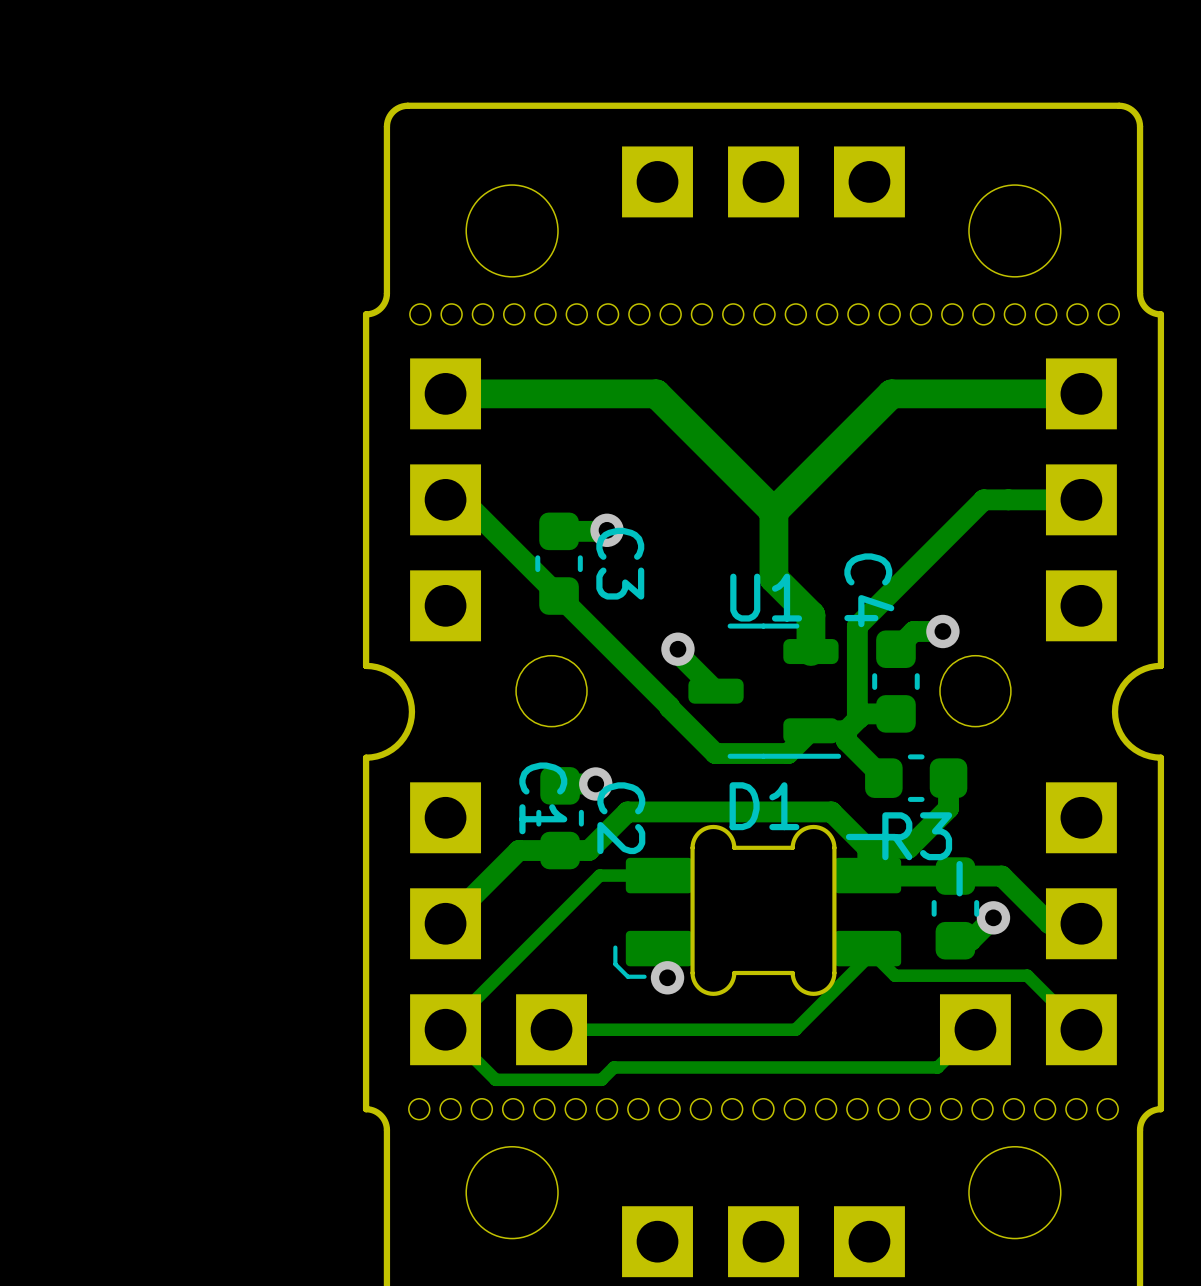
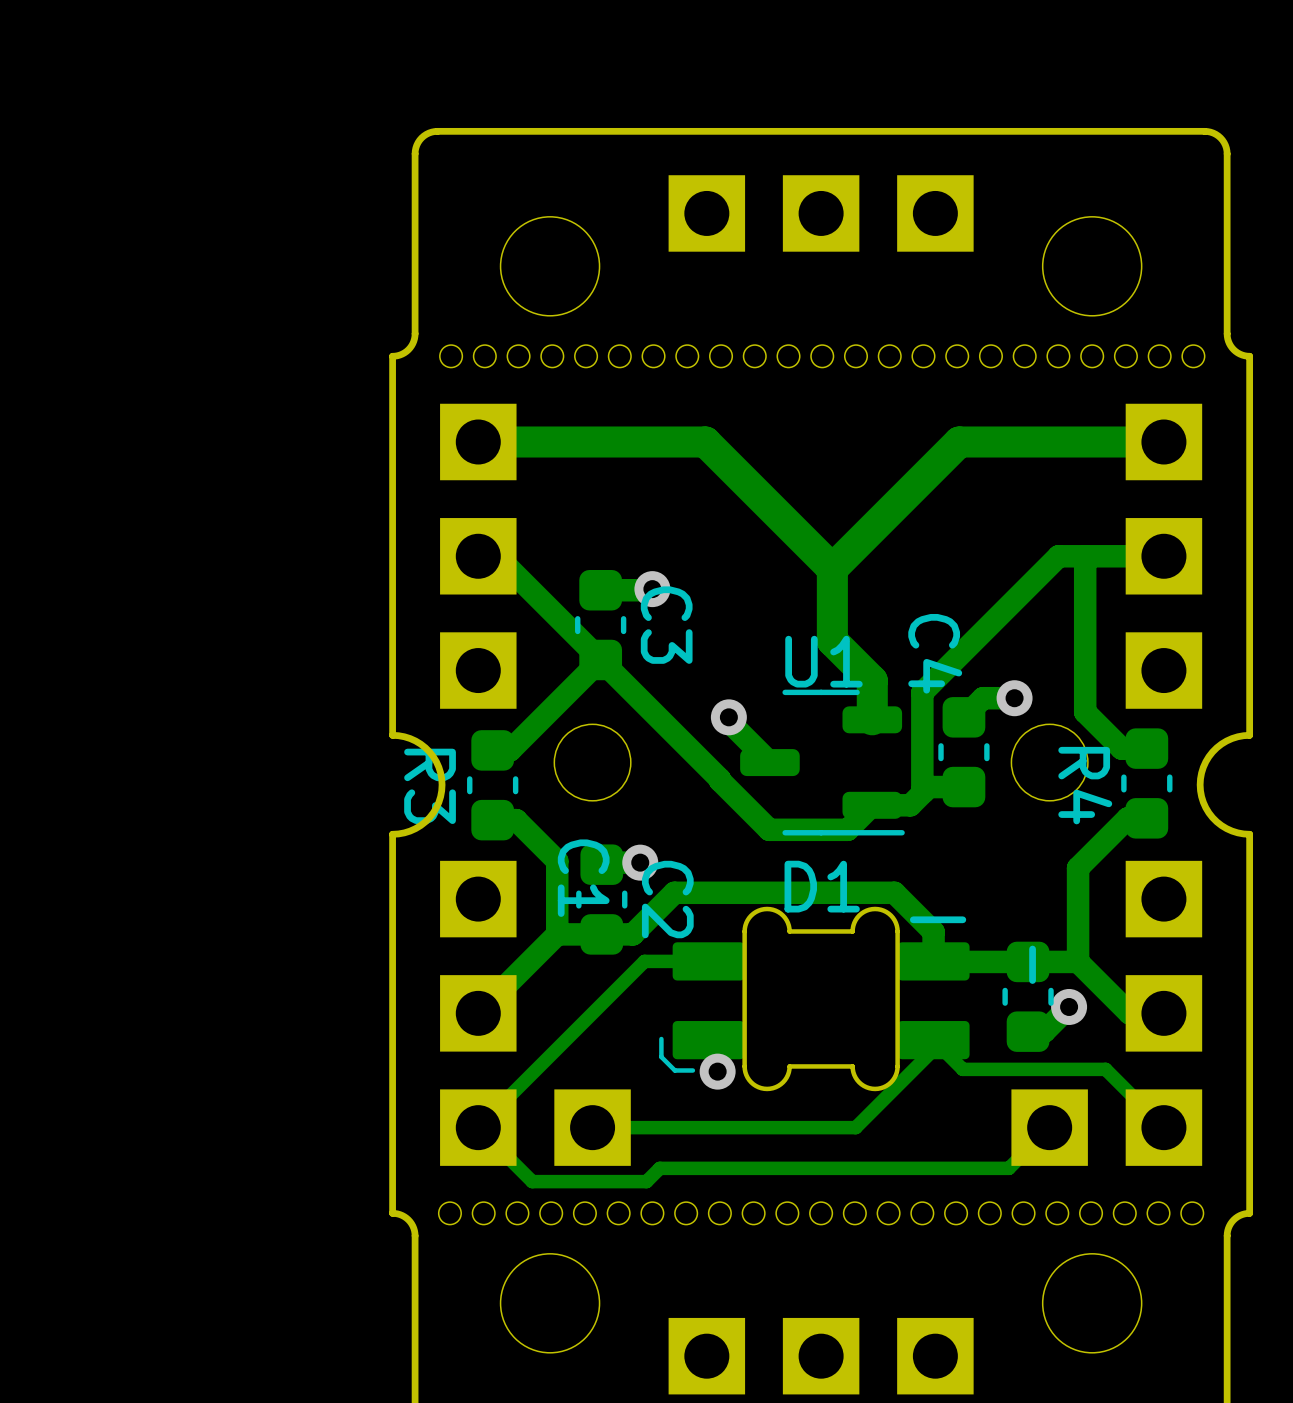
track: none -> (1085, 556) (1085, 712) (1121, 748) (1146, 748)
track: none -> (600, 659) (510, 750) (492, 750)
R4: none -> (1146, 783)
track: (846, 730) (846, 740) (883, 778) -> none
track: none -> (1146, 818) (1127, 818) (1078, 867) (1078, 961)
track: none -> (492, 820) (516, 820) (557, 861) (557, 934)
R3 rotation: 0° (916, 778) -> 90° clockwise (492, 785)
R3 position: (916, 778) -> (492, 785)
track: (948, 778) (948, 808) (908, 848) (867, 848) -> none

